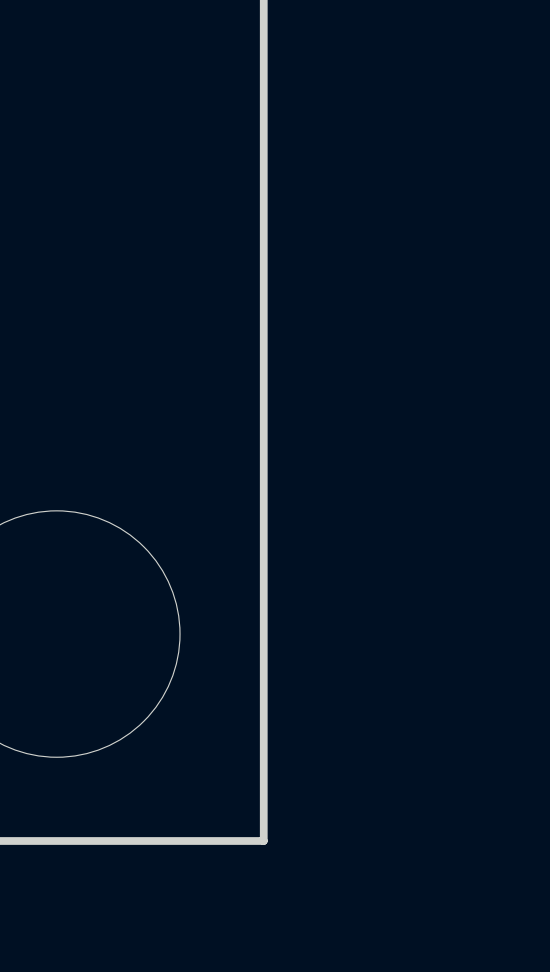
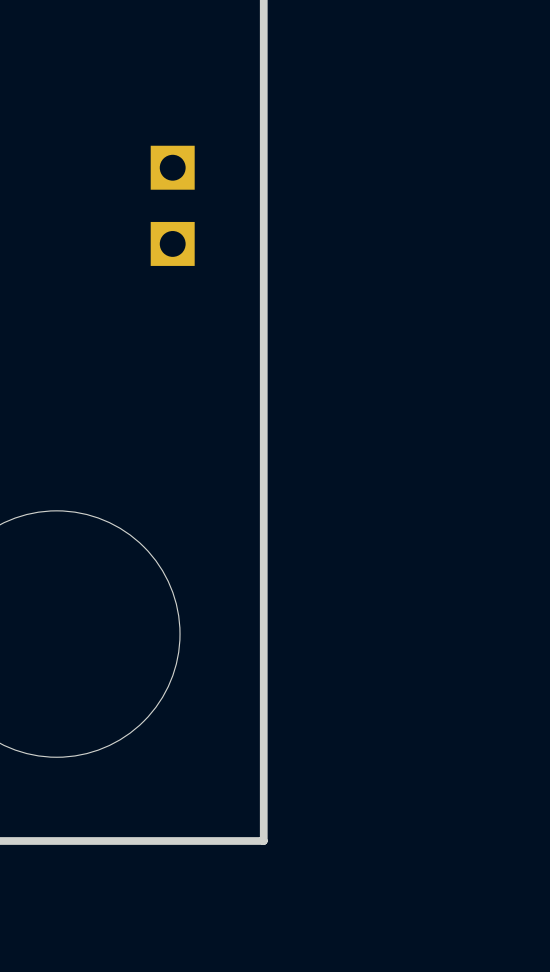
part: none -> (172, 167)
part: none -> (172, 243)

